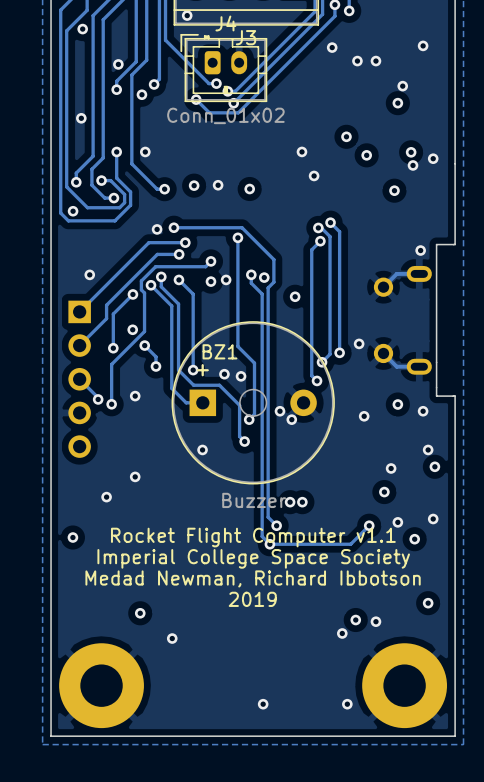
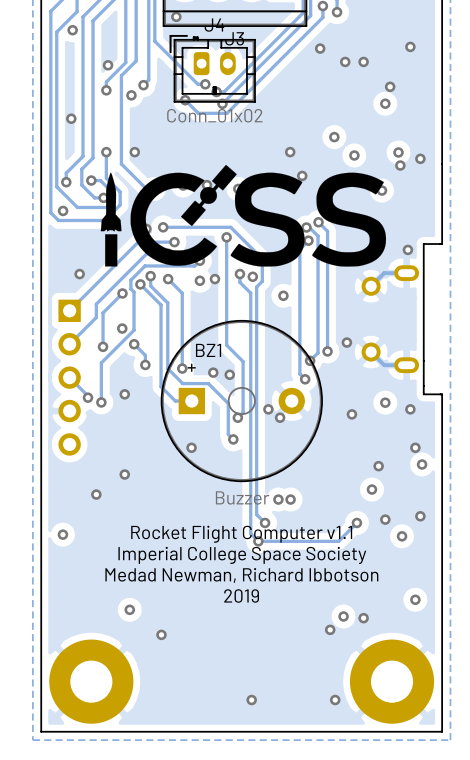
drawing: none -> [100, 164, 387, 267]

